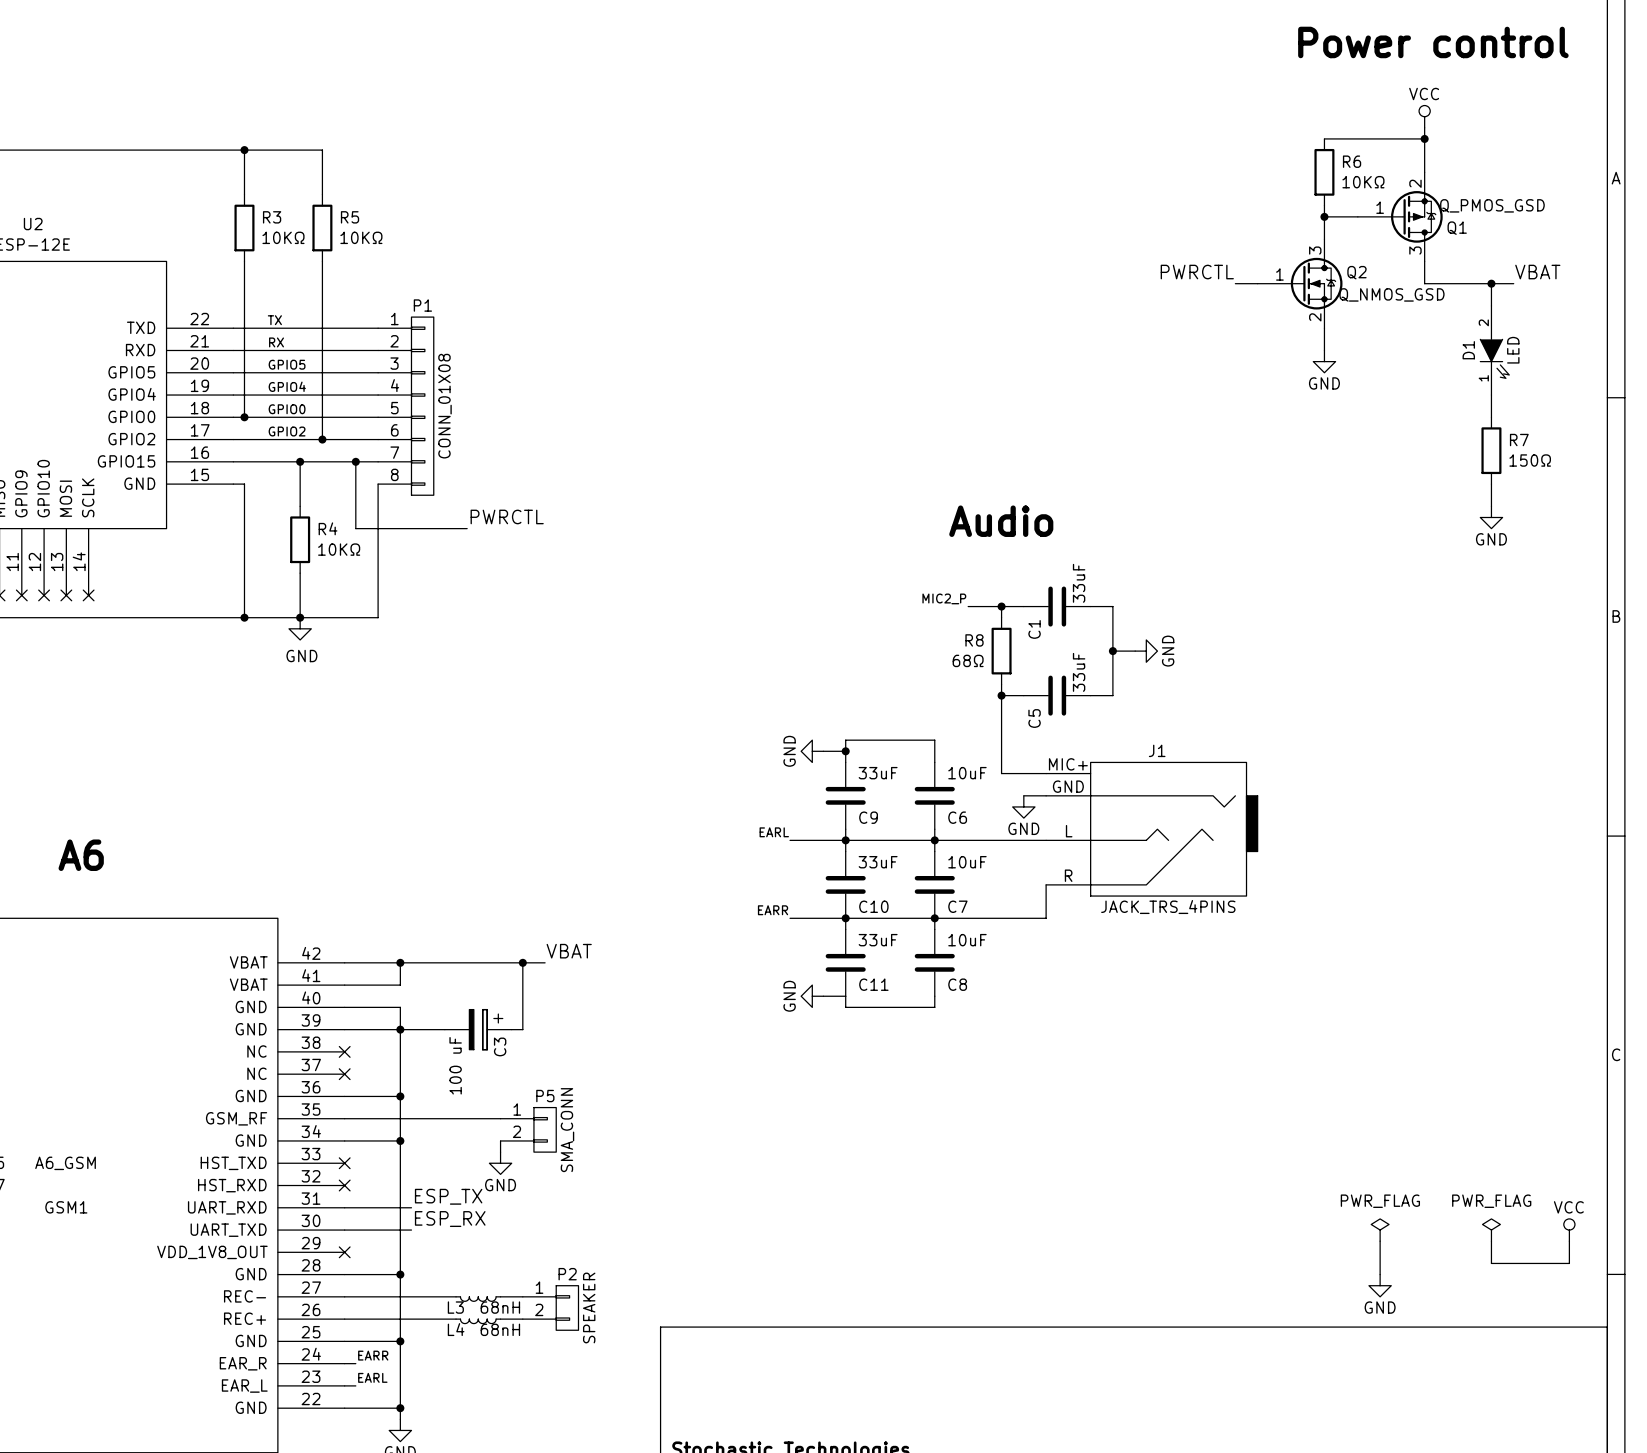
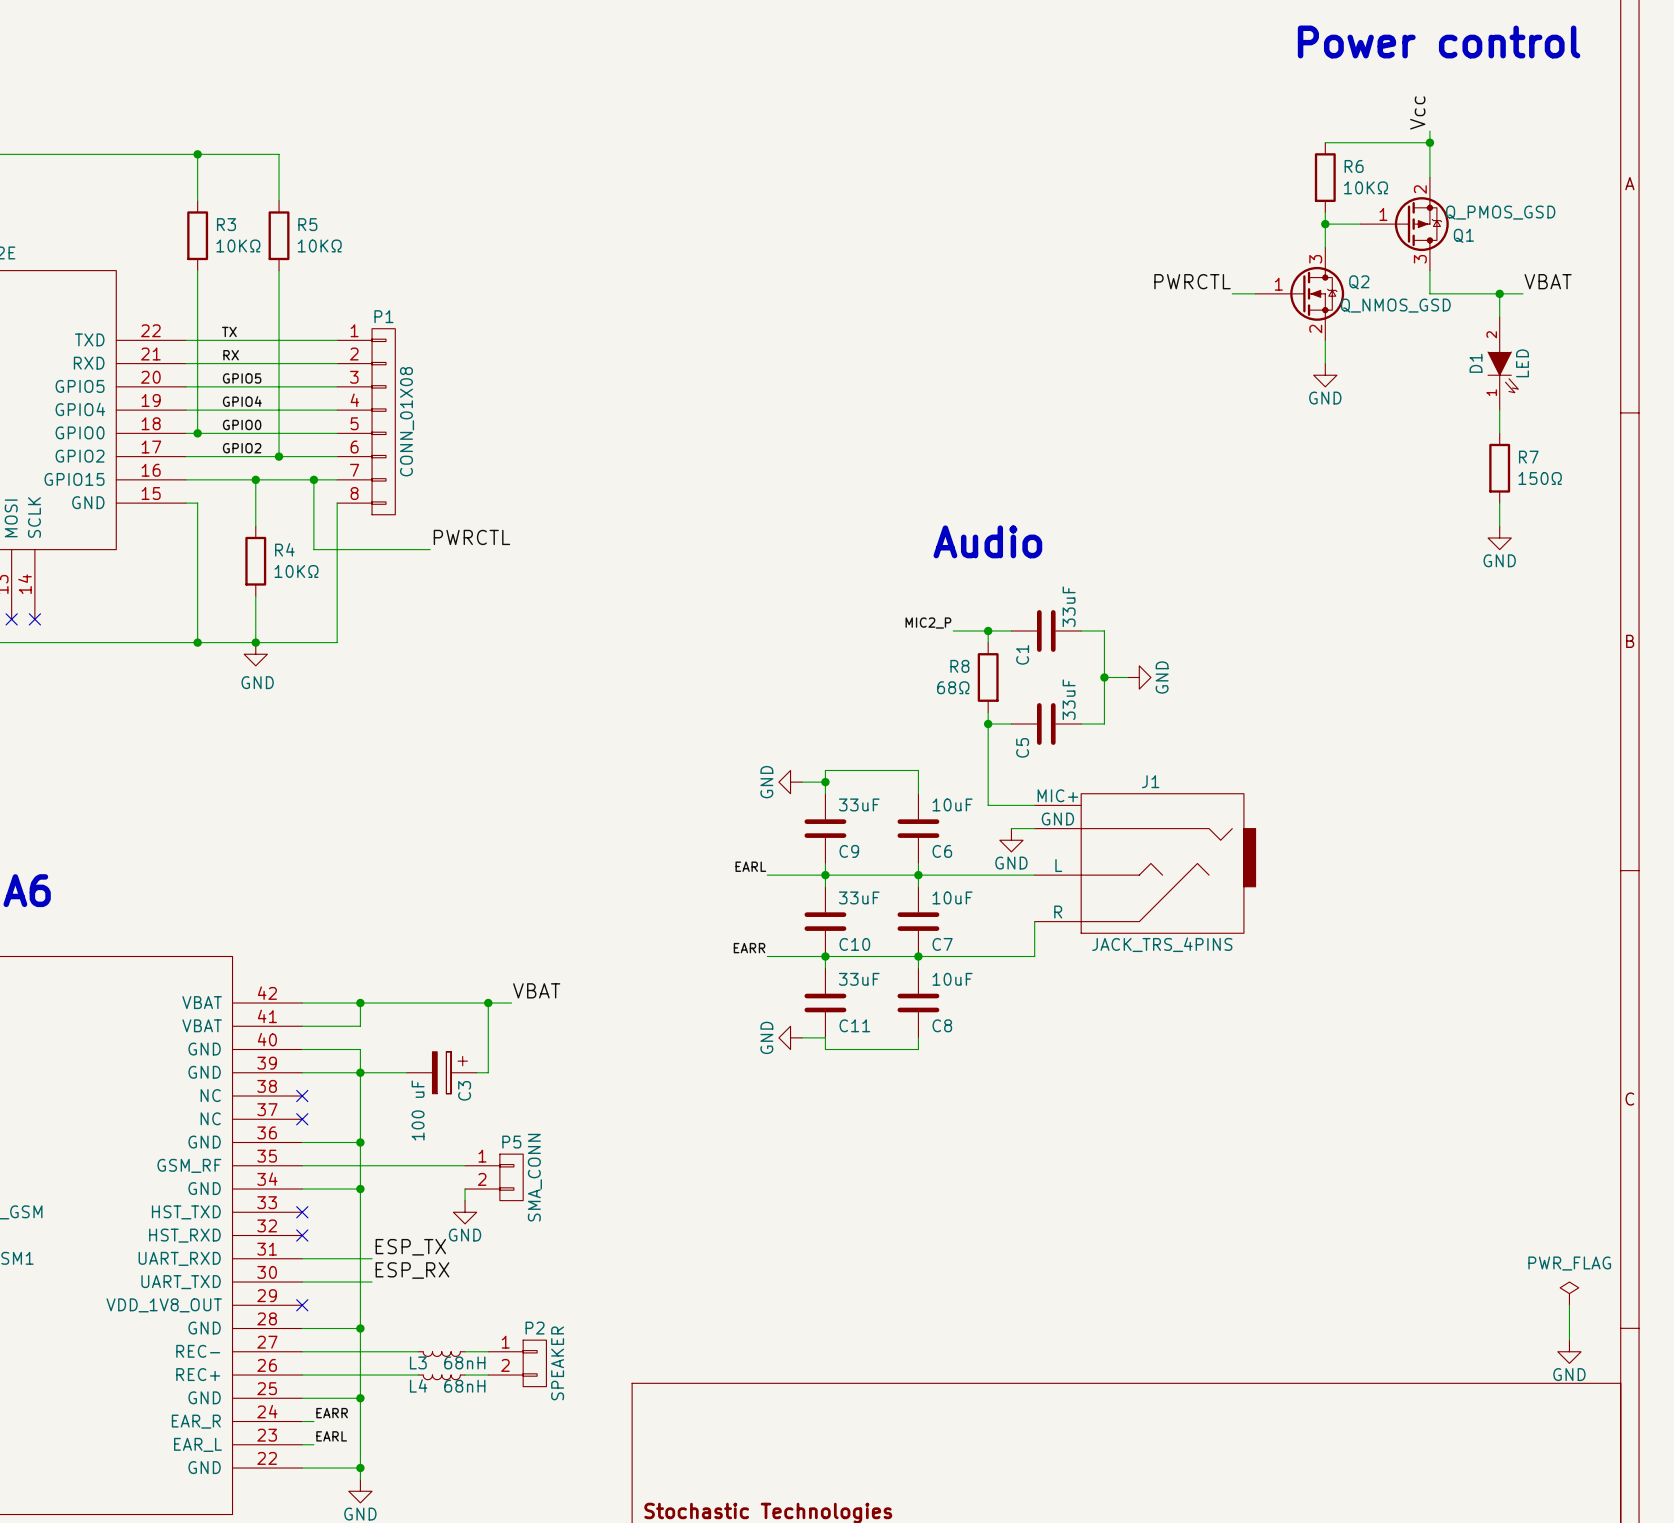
label: none -> Vcc (1417, 112)
power symbol: VCC (1424, 116) -> none
power symbol: PWR_FLAG (1380, 1230) -> none
power symbol position: PWR_FLAG (1491, 1230) -> PWR_FLAG (1569, 1293)
power symbol: VCC (1569, 1230) -> none
wire: (1380, 1241) (1380, 1274) -> (1569, 1305) (1569, 1340)
wire: (1491, 1241) (1491, 1263) (1569, 1263) (1569, 1241) -> none
power symbol position: GND (1380, 1285) -> GND (1569, 1351)

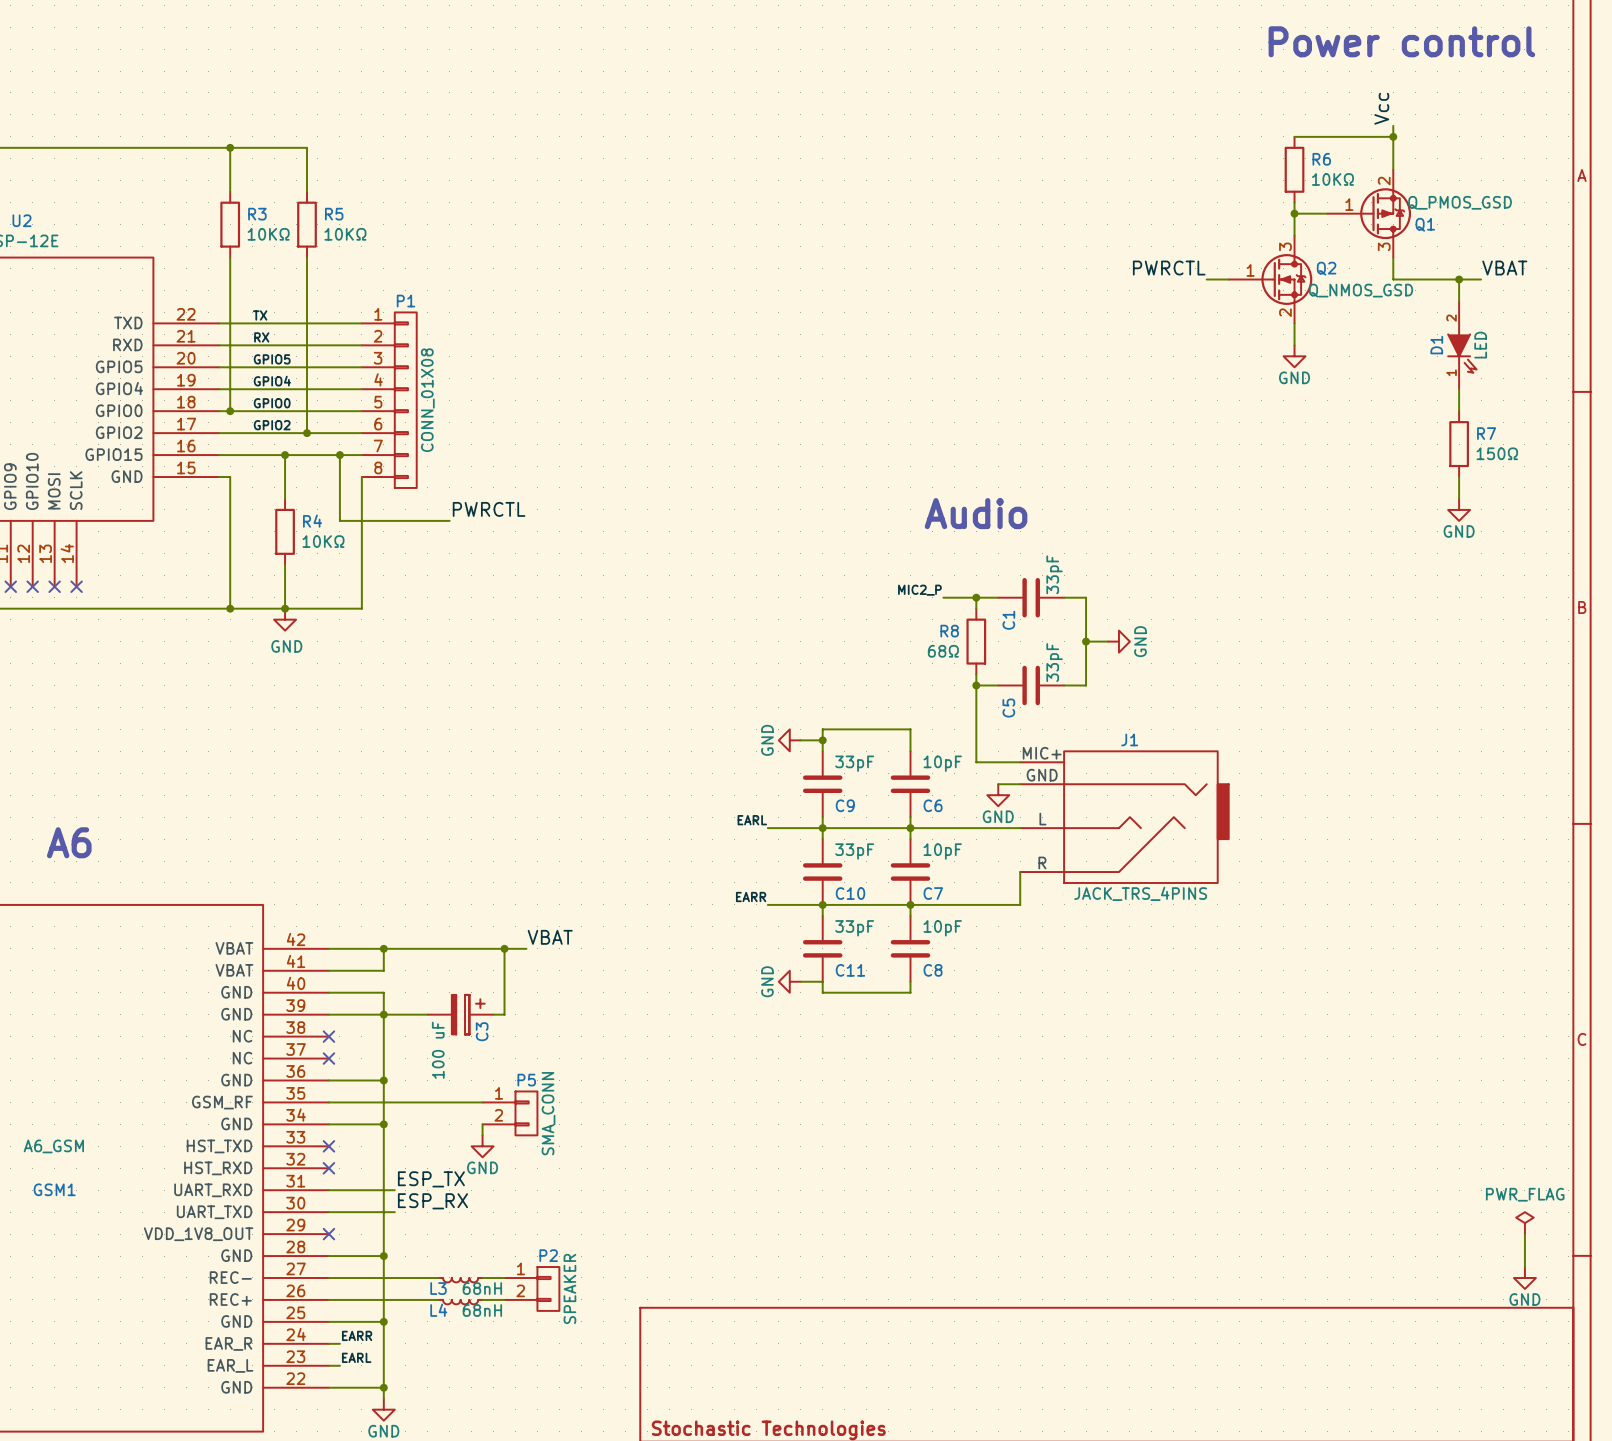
C1 value: 33uF (1069, 606) -> 33pF (1054, 574)
C5 value: 33uF (1069, 699) -> 33pF (1054, 662)
C9 value: 33uF (859, 804) -> 33pF (854, 763)
C6 value: 10uF (952, 804) -> 10pF (942, 763)
C10 value: 33uF (859, 897) -> 33pF (854, 851)
C7 value: 10uF (952, 897) -> 10pF (942, 851)
C11 value: 33uF (859, 979) -> 33pF (854, 928)
C8 value: 10uF (952, 979) -> 10pF (942, 928)

